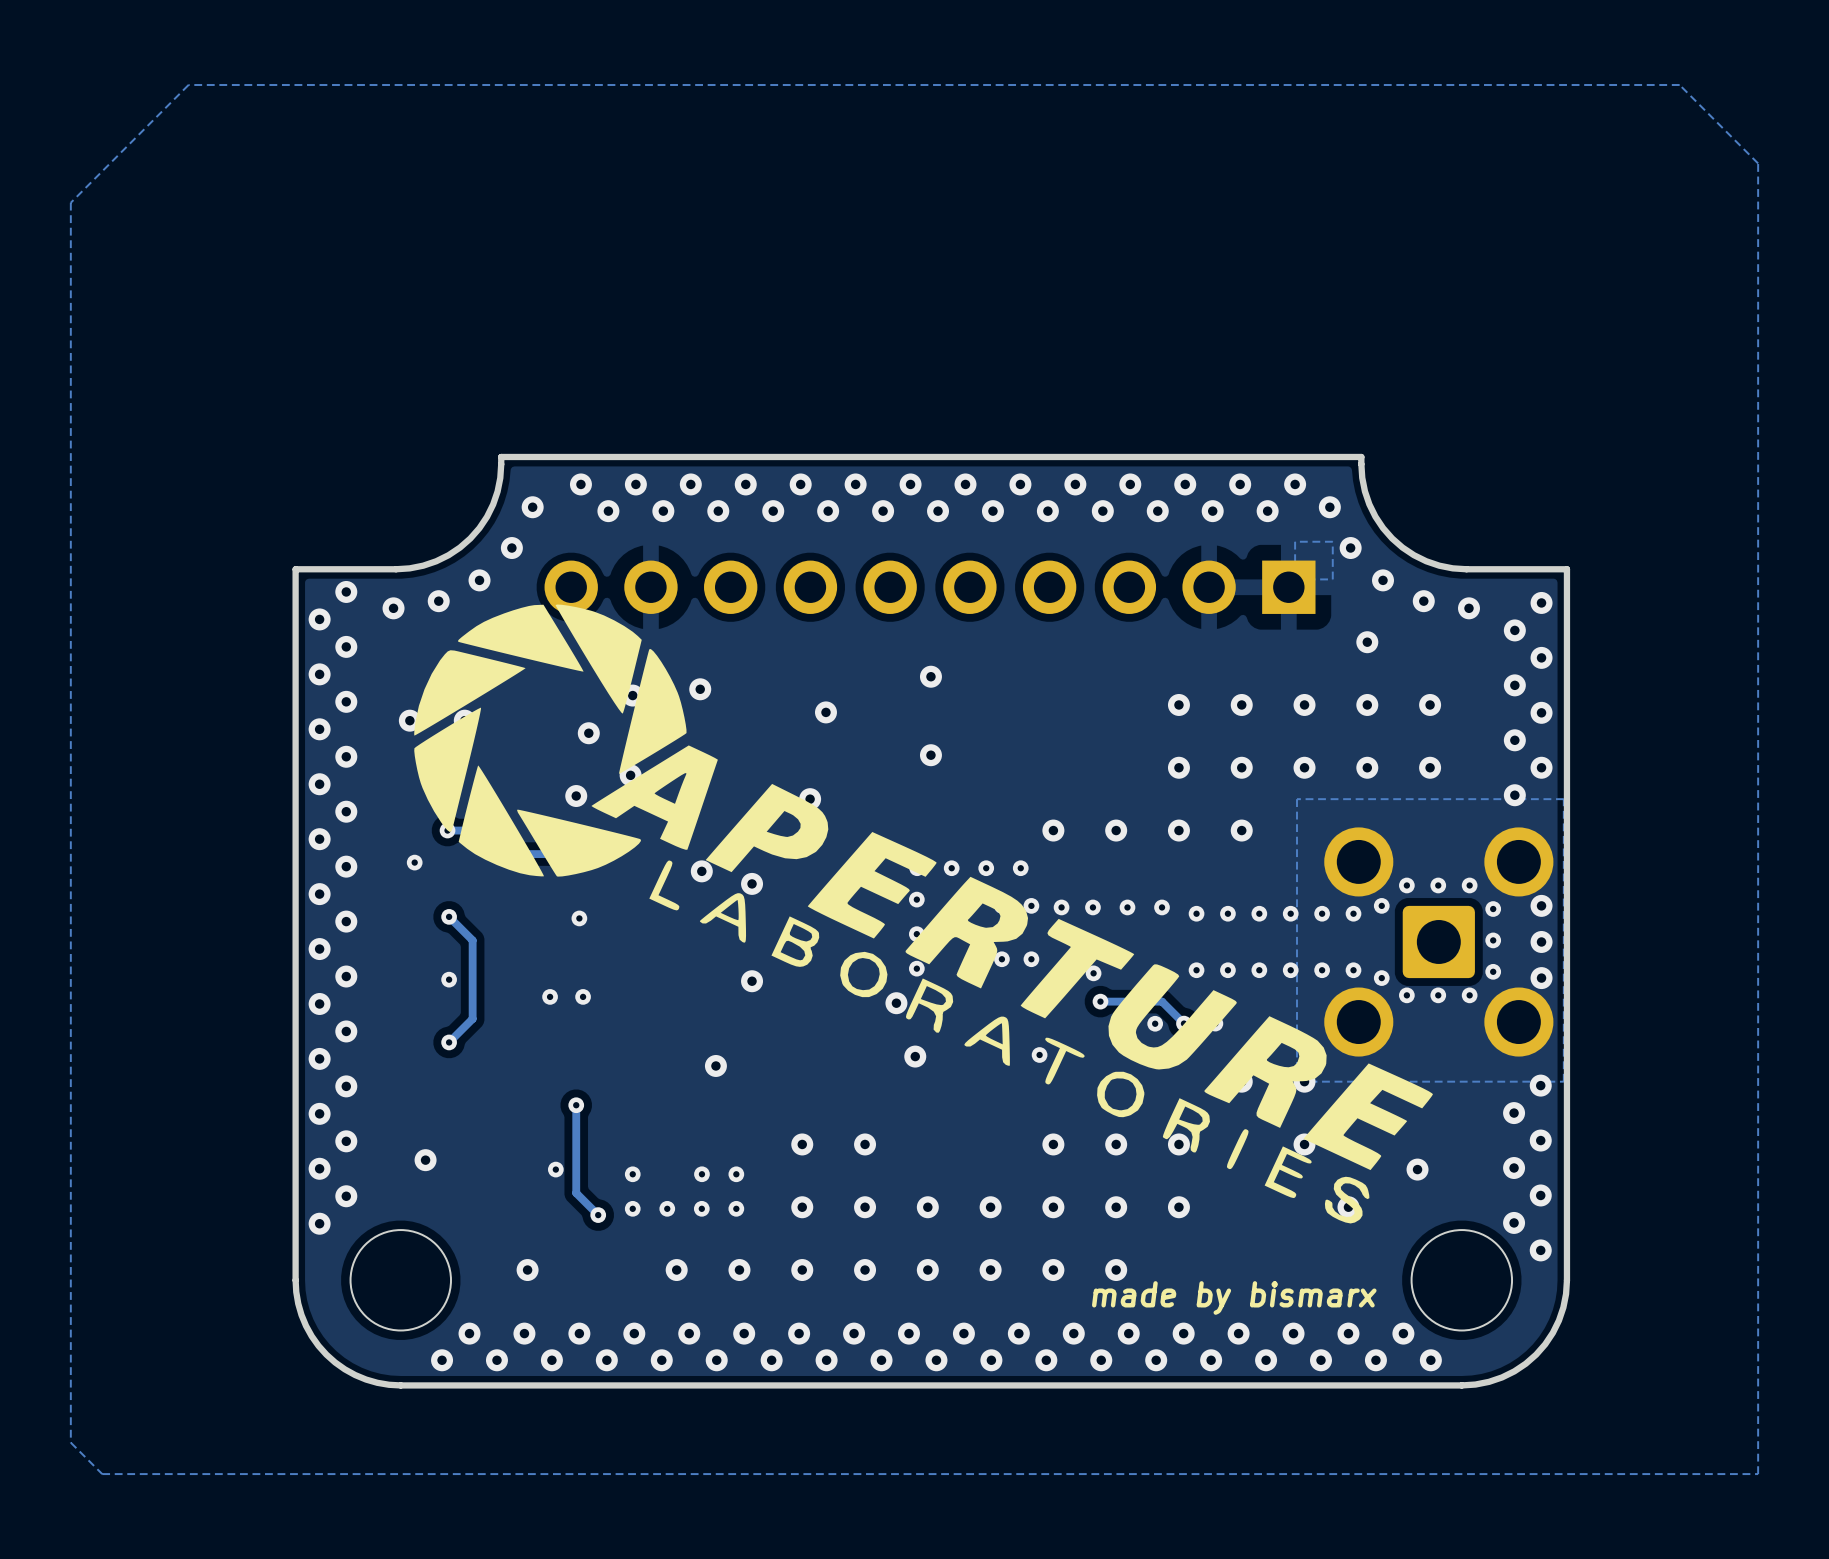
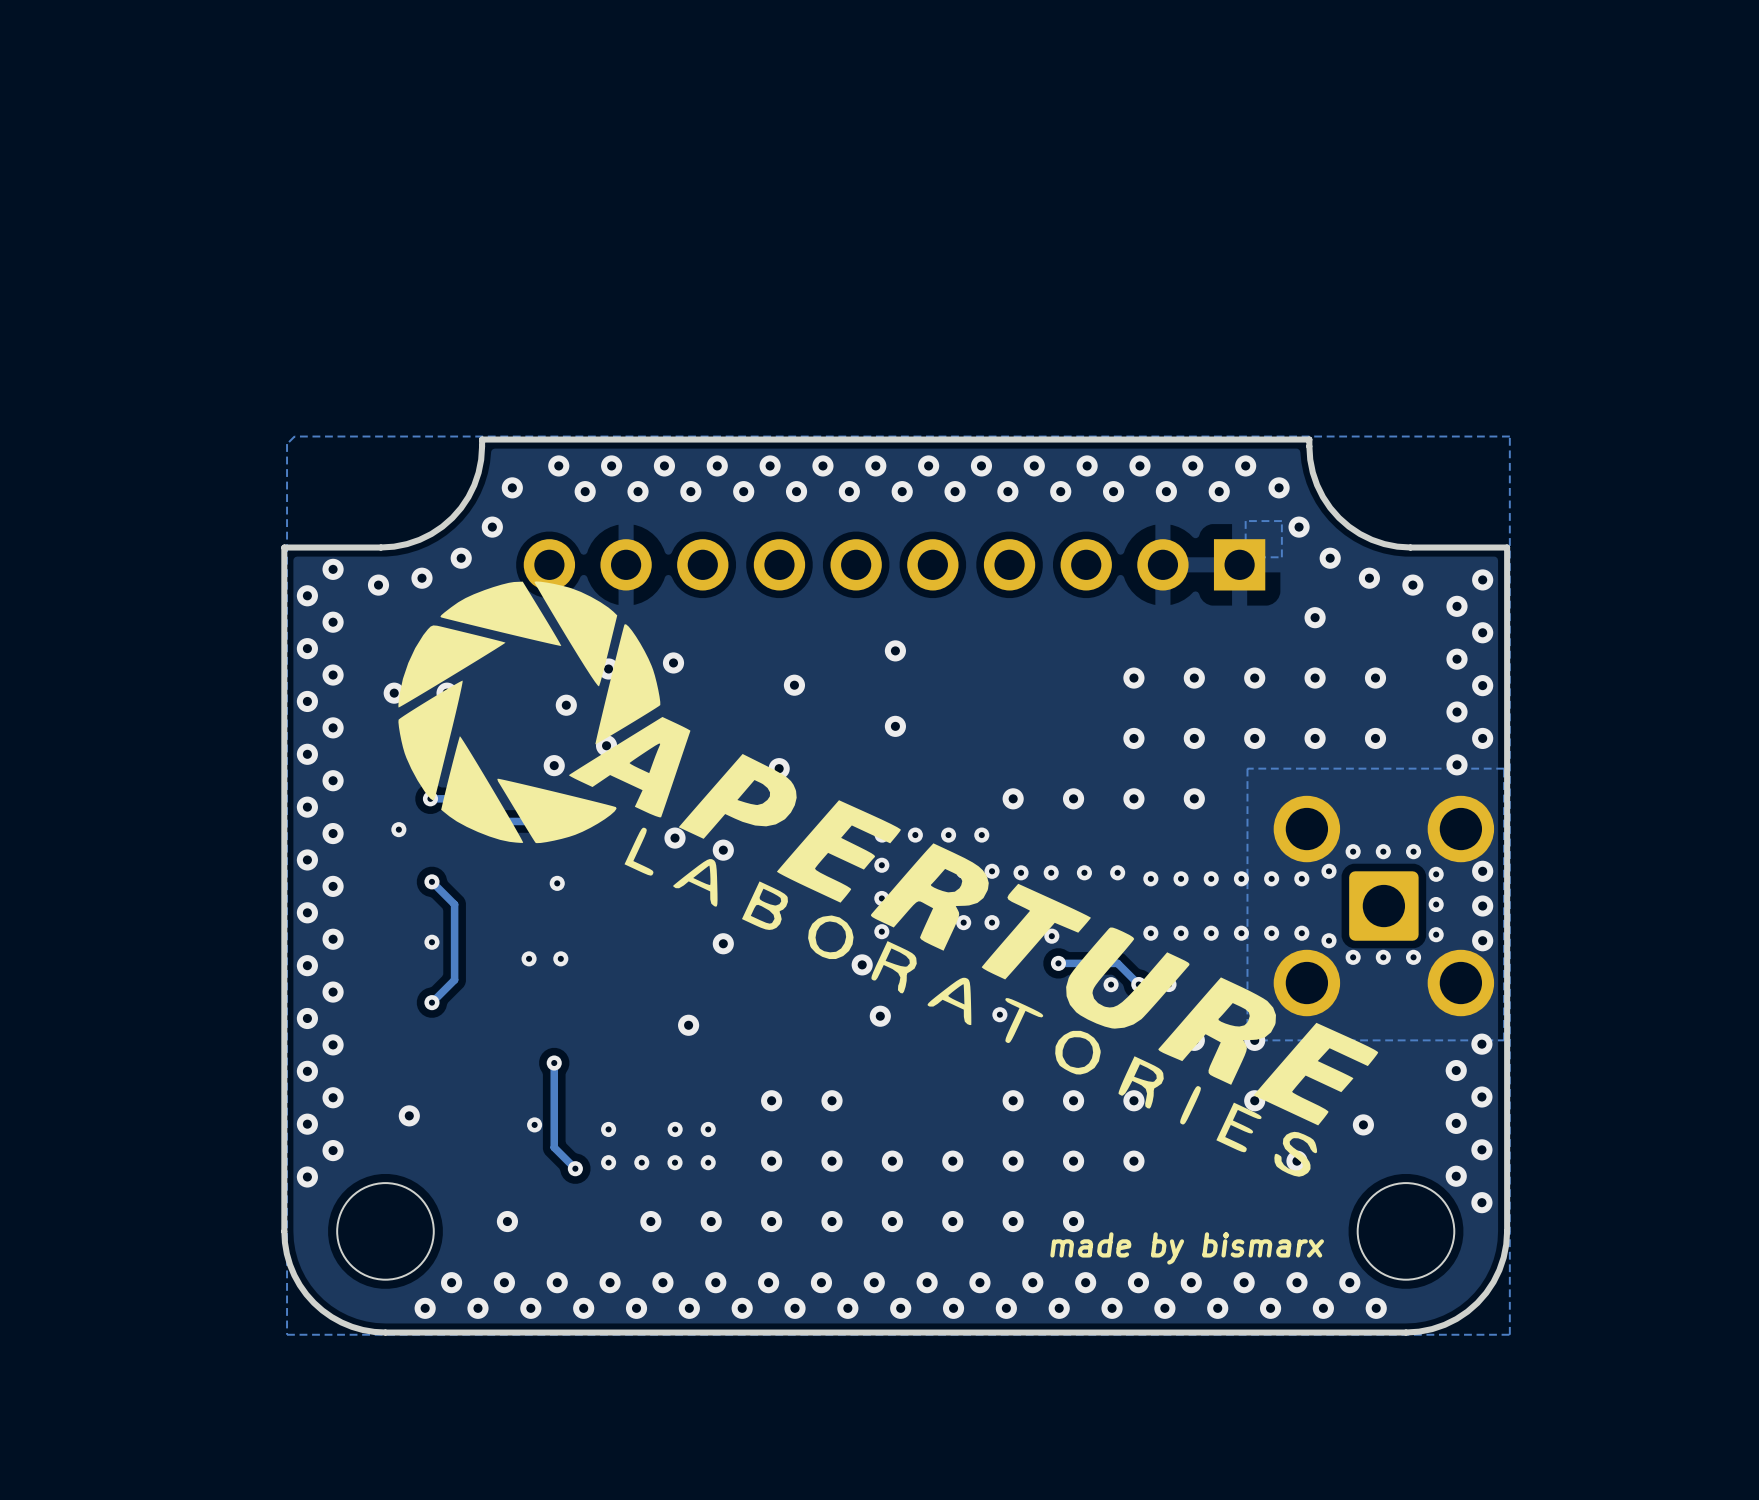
zone outline: (1679, 84) (1758, 163) (1758, 1474) (102, 1474) (70, 1442) (70, 202) (188, 84) (1679, 84) -> (1509, 436) (1509, 1334) (287, 1334) (287, 444) (294, 436) (1509, 436)

